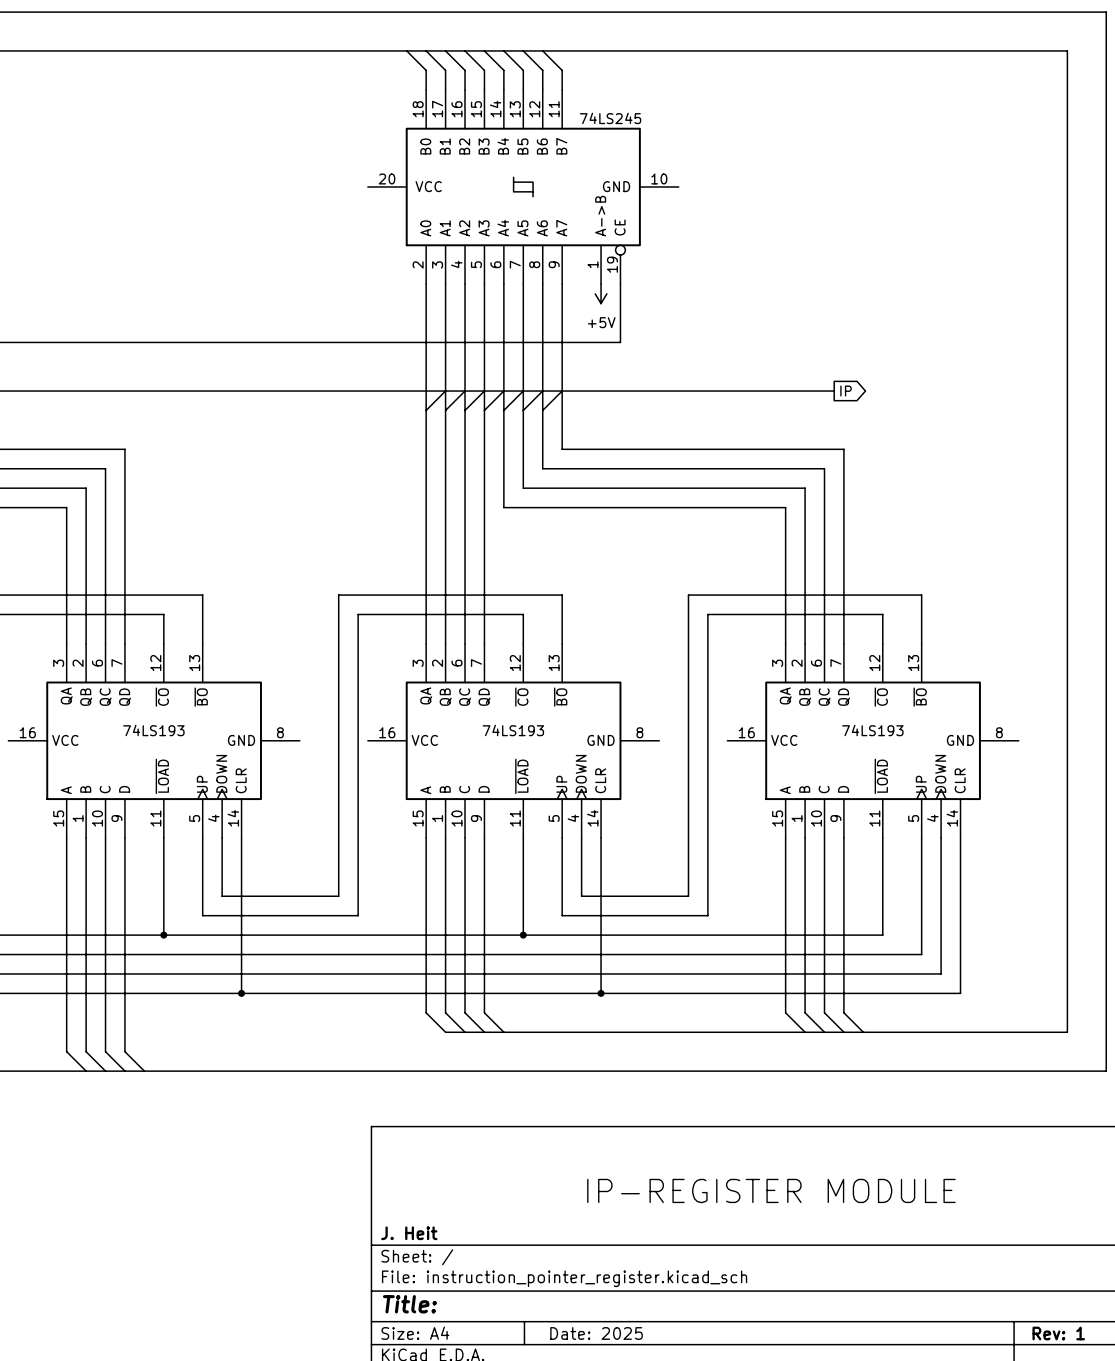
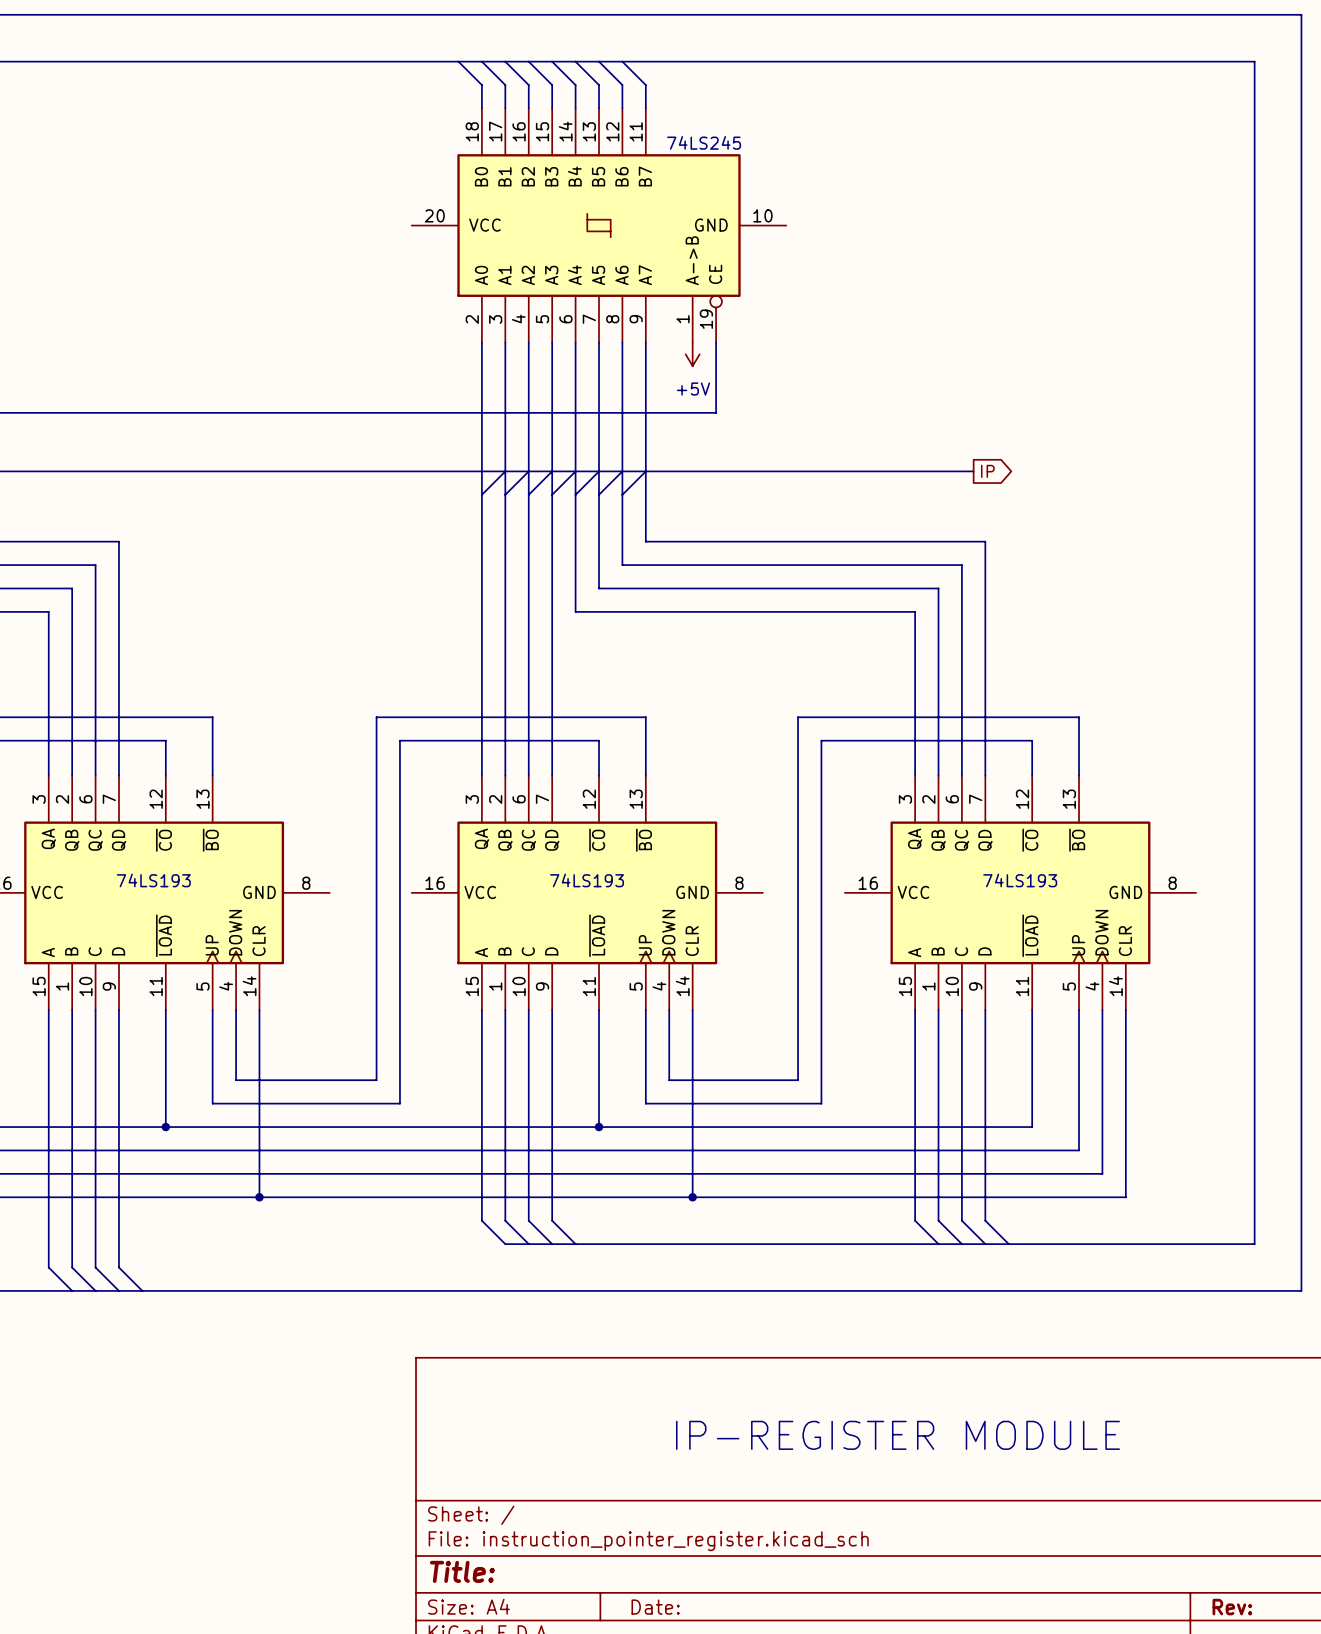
title block: J. Heit (409, 1233) -> none
title block: Date: 2025 (596, 1333) -> Date: (655, 1607)
title block: Rev: 1 (1058, 1333) -> Rev: (1232, 1607)

